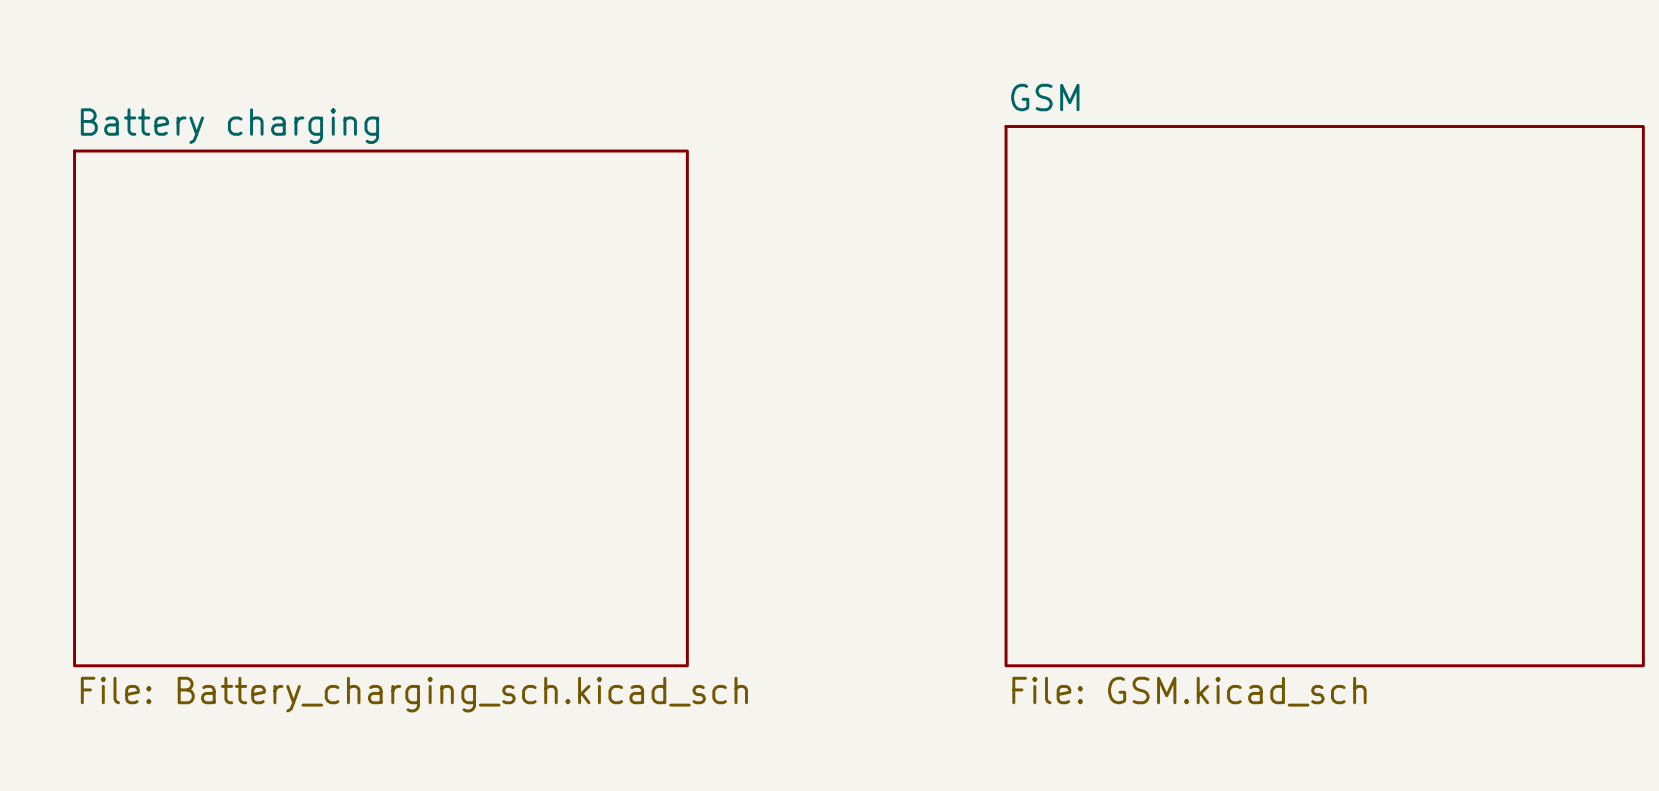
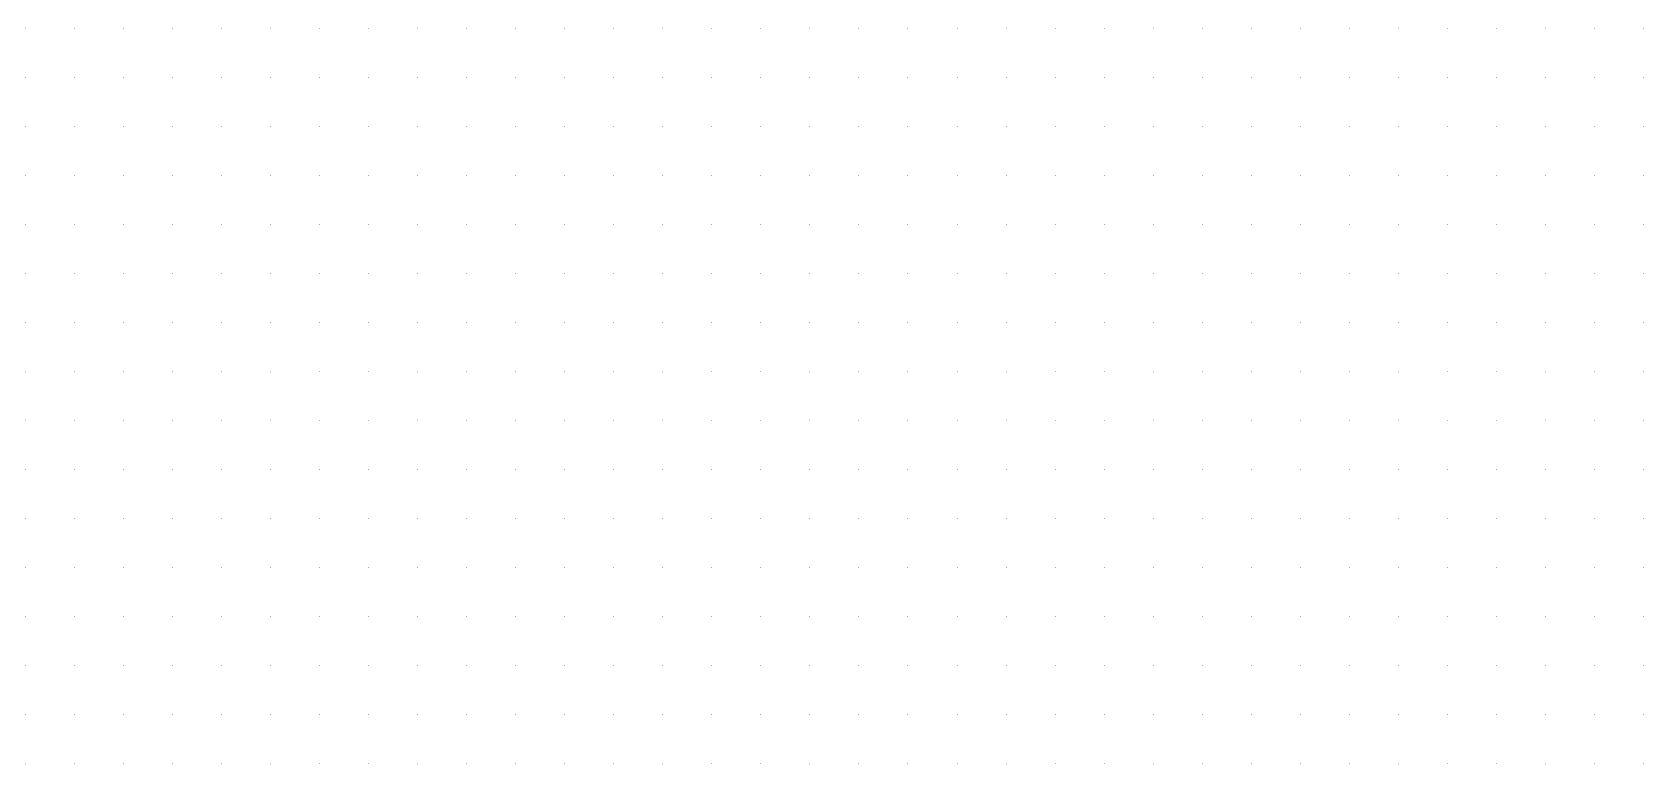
sheet GSM: File: GSM.kicad_sch (1324, 396) -> none
sheet Battery charging: File: Battery_charging_sch.kicad_sch (380, 408) -> none

